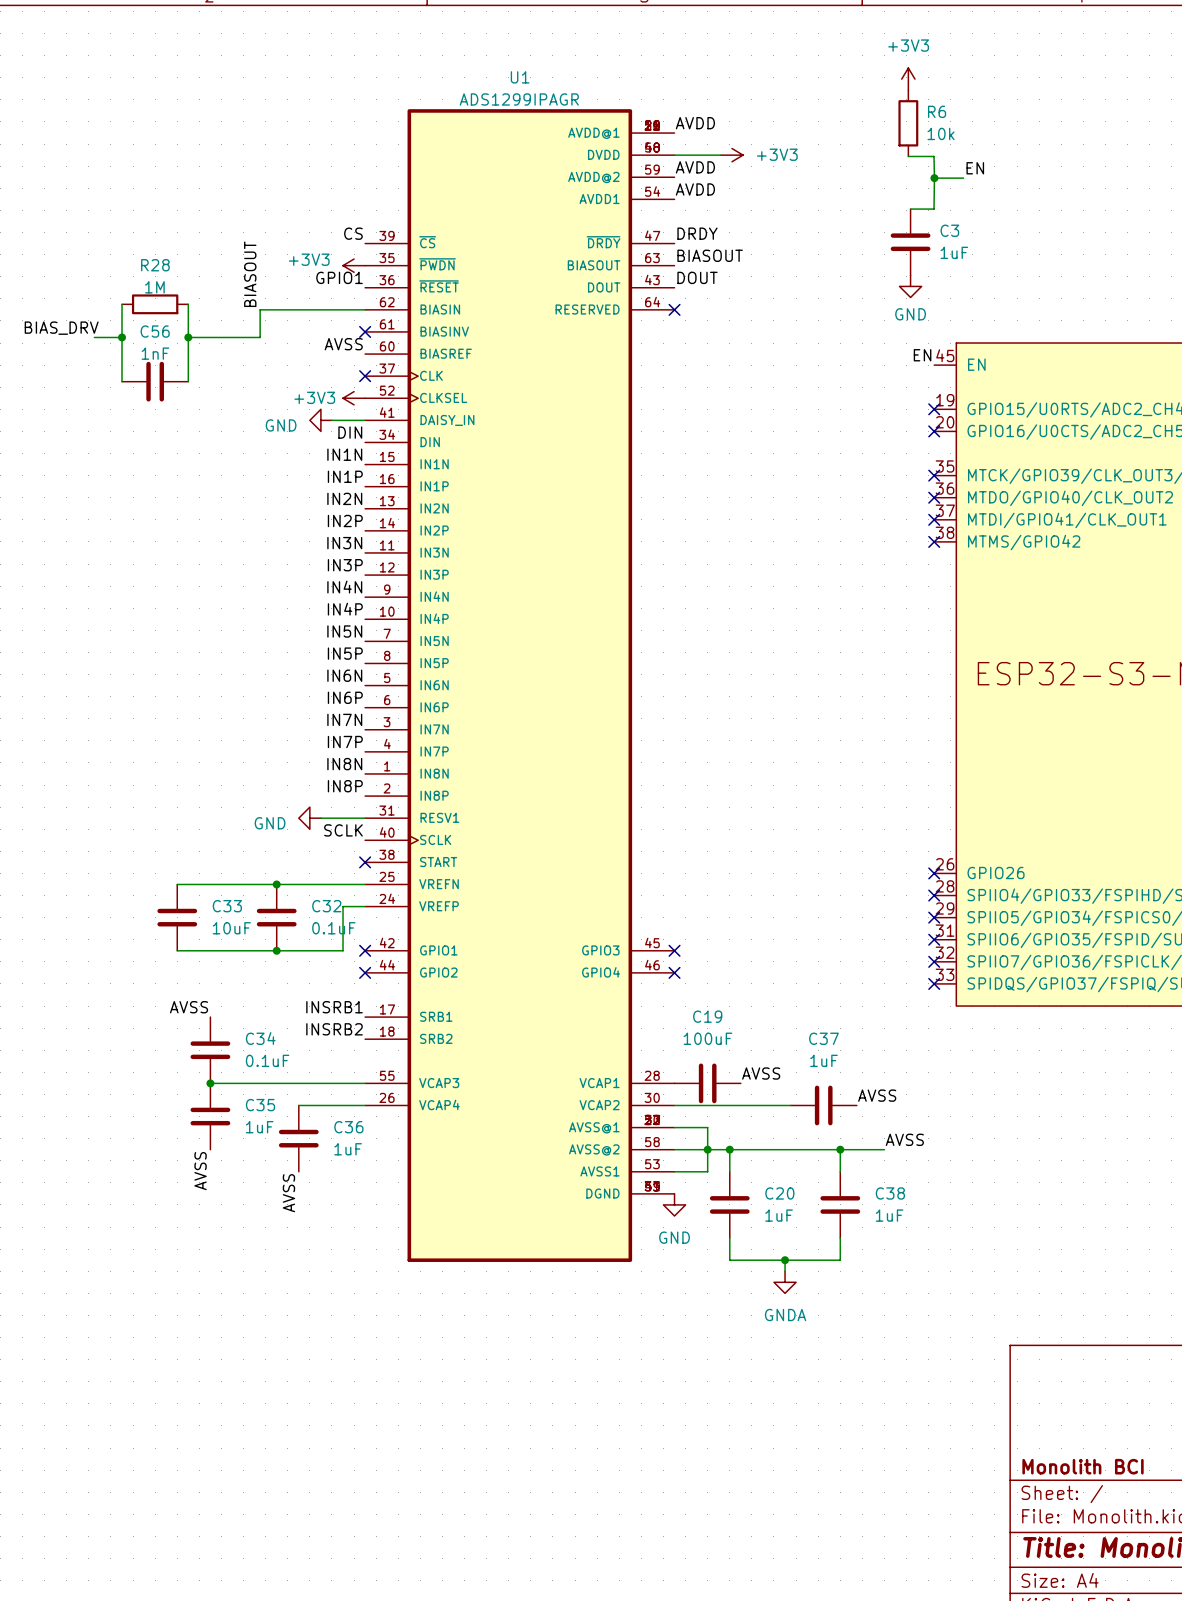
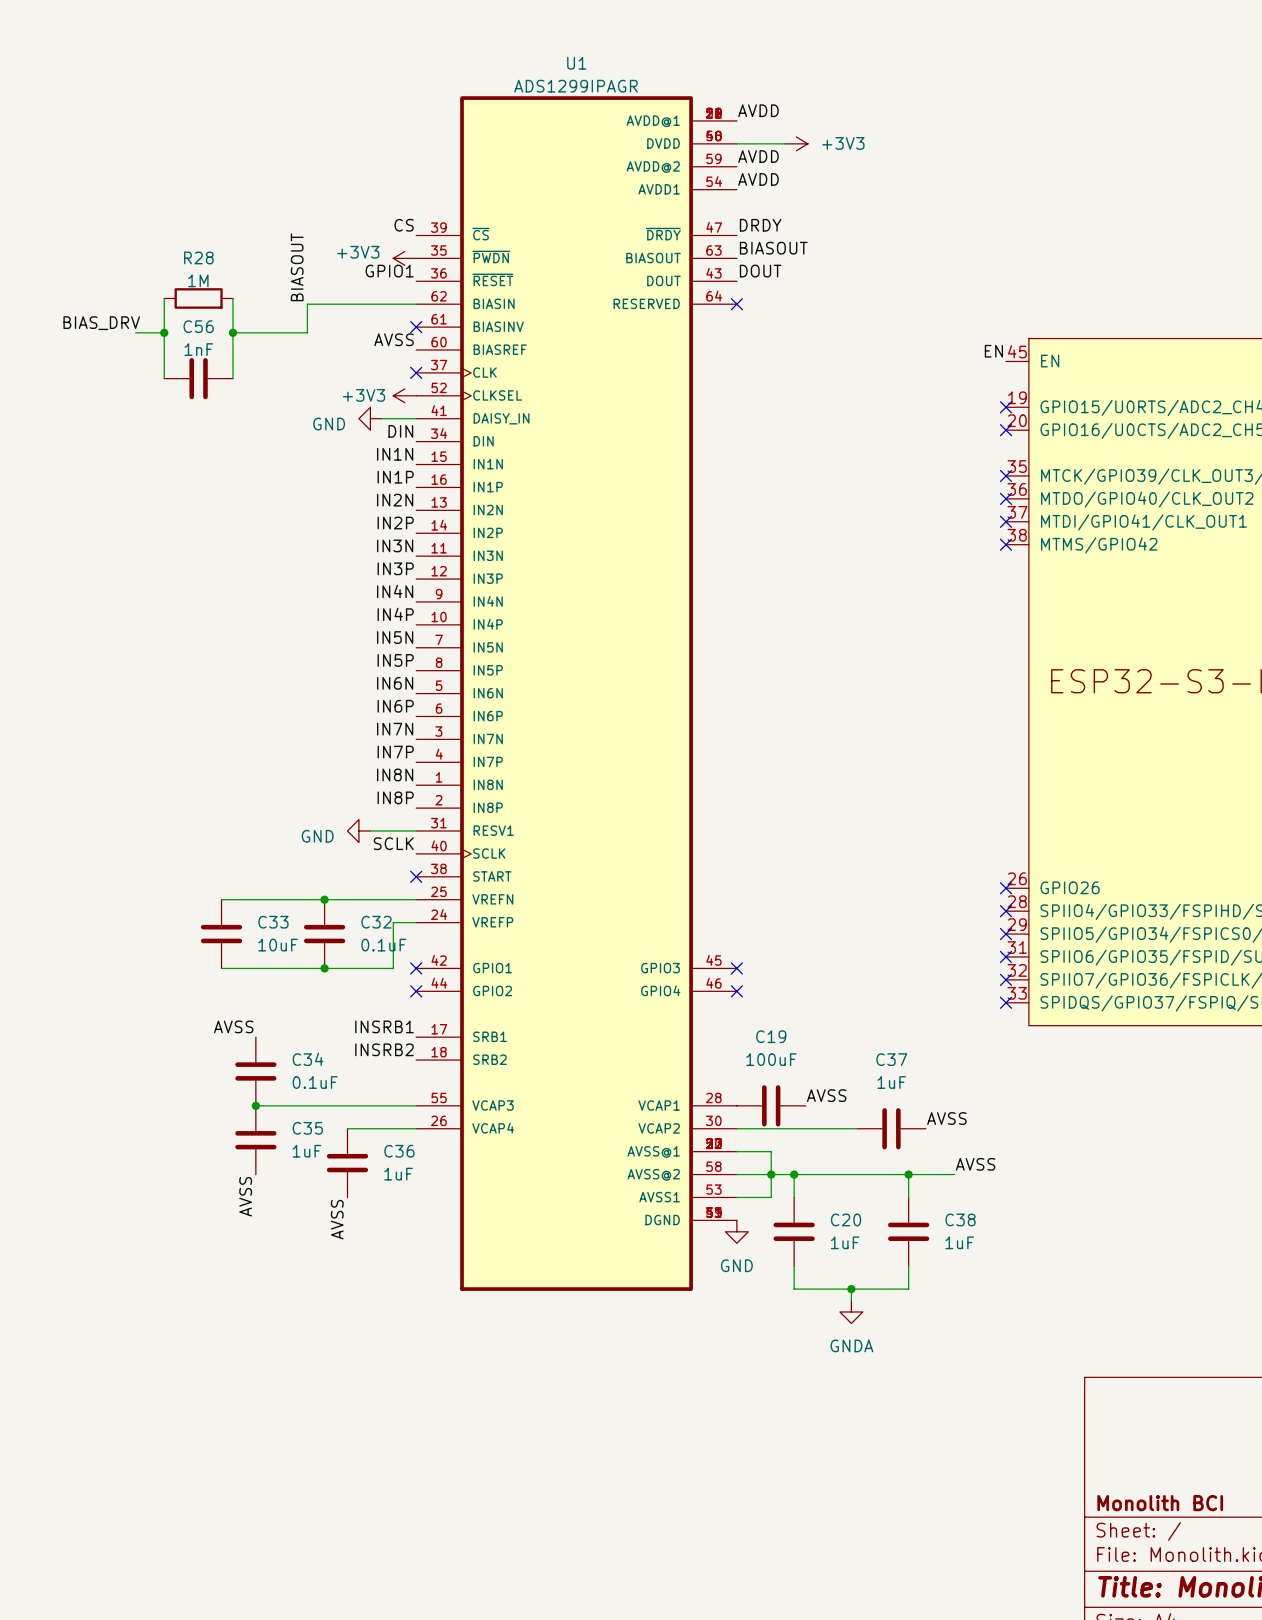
power symbol: +3V3 (908, 79) -> none
R6: 10k (908, 123) -> none
wire: (908, 156) (933, 156) (934, 178) -> none
label: EN (975, 168) -> none
wire: (934, 178) (933, 209) (910, 209) -> none
wire: (934, 178) (963, 178) -> none
junction: (934, 178) -> none
C3: 1uF (910, 242) -> none
power symbol: GND (910, 286) -> none

